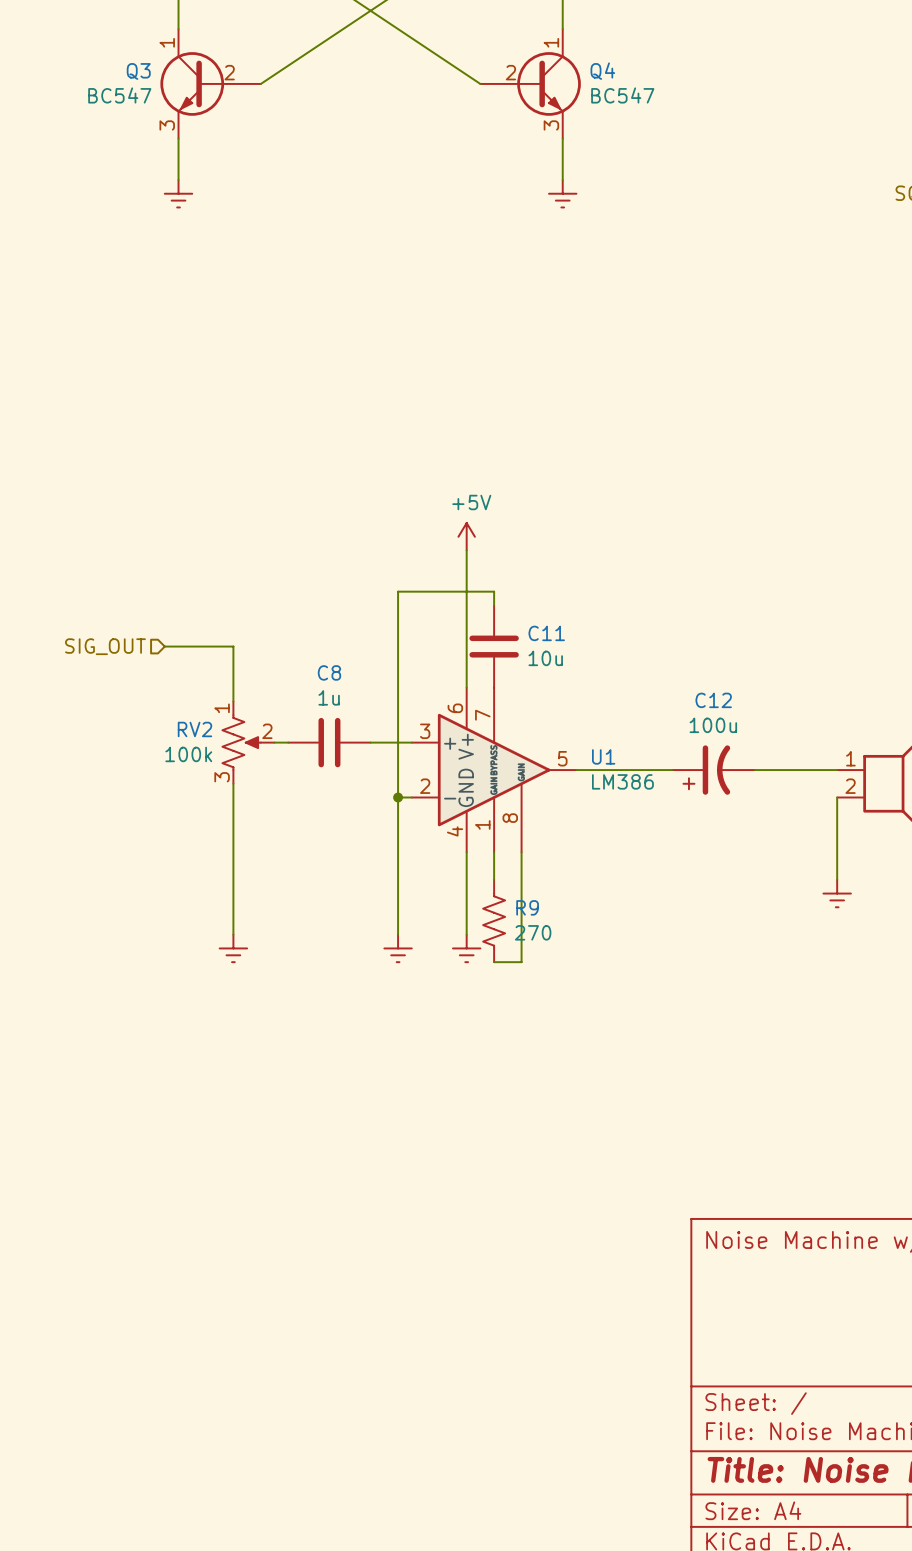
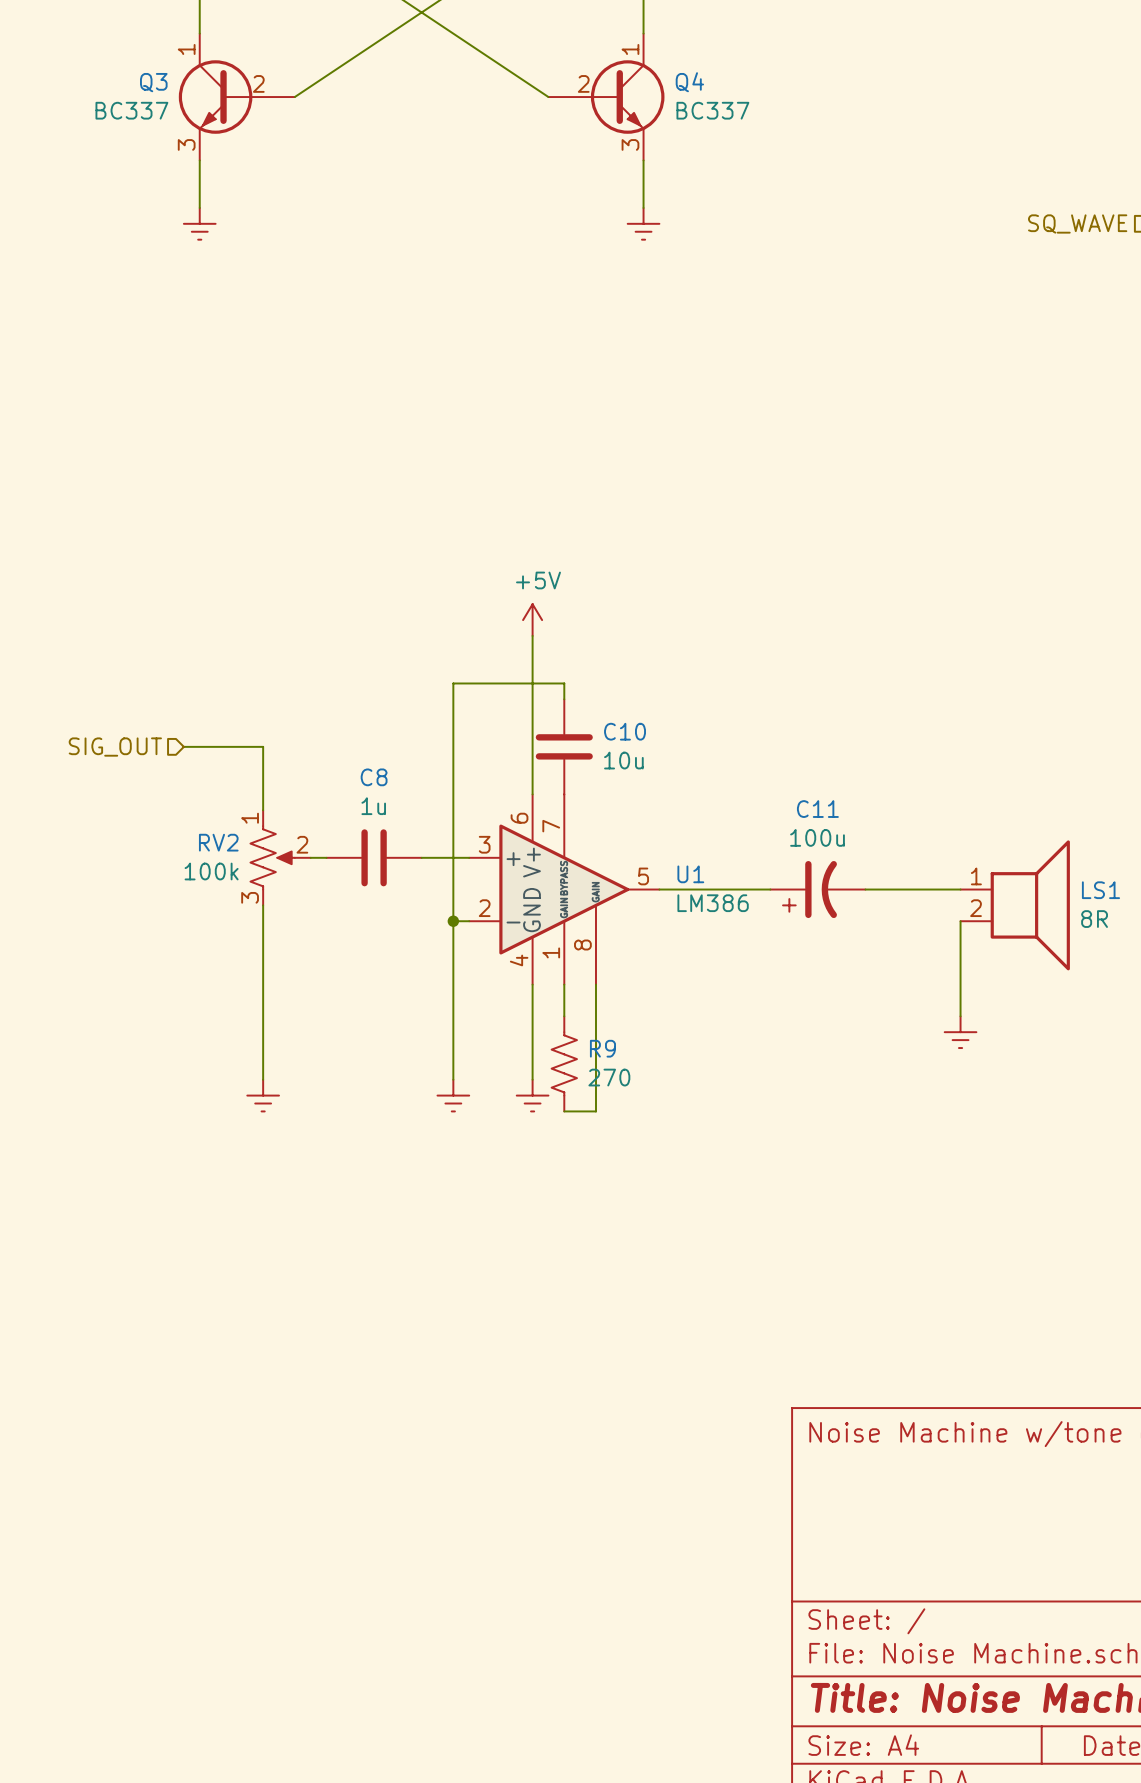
Q3 value: BC547 (119, 95) -> BC337 (131, 110)
Q4 value: BC547 (622, 95) -> BC337 (712, 110)
C11 name: C11 (546, 633) -> C10 (625, 731)
C12 name: C12 (713, 700) -> C11 (817, 809)

